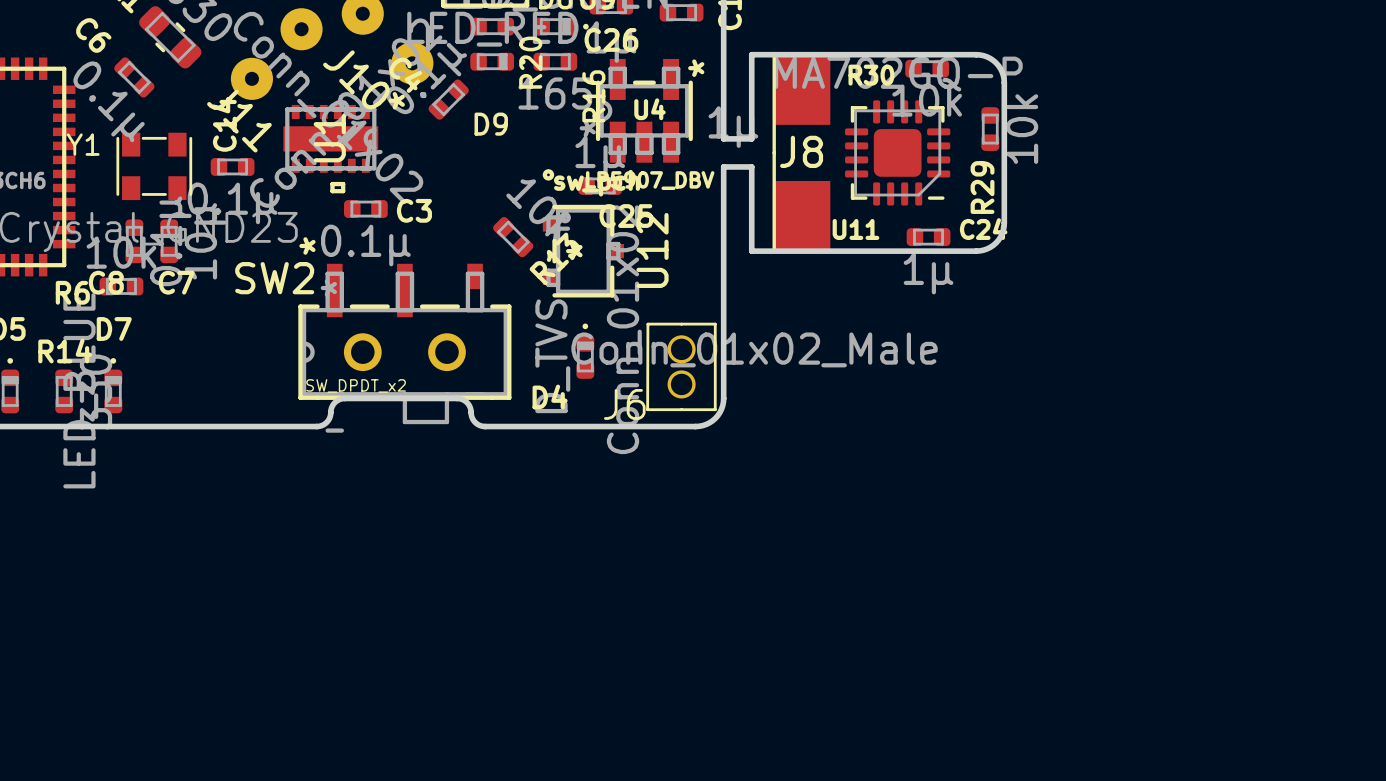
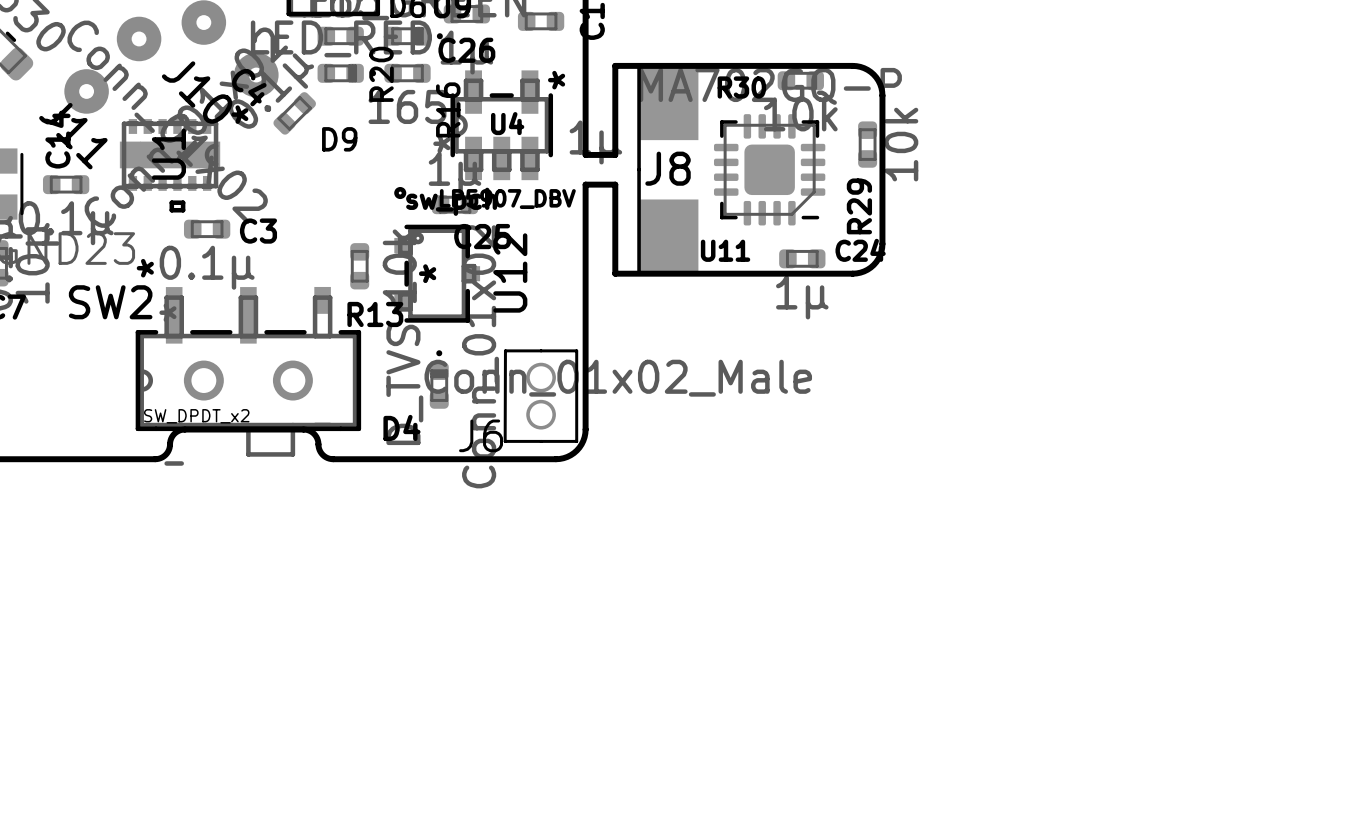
R13 rotation: 0° (513, 237) -> 45° clockwise (359, 266)

